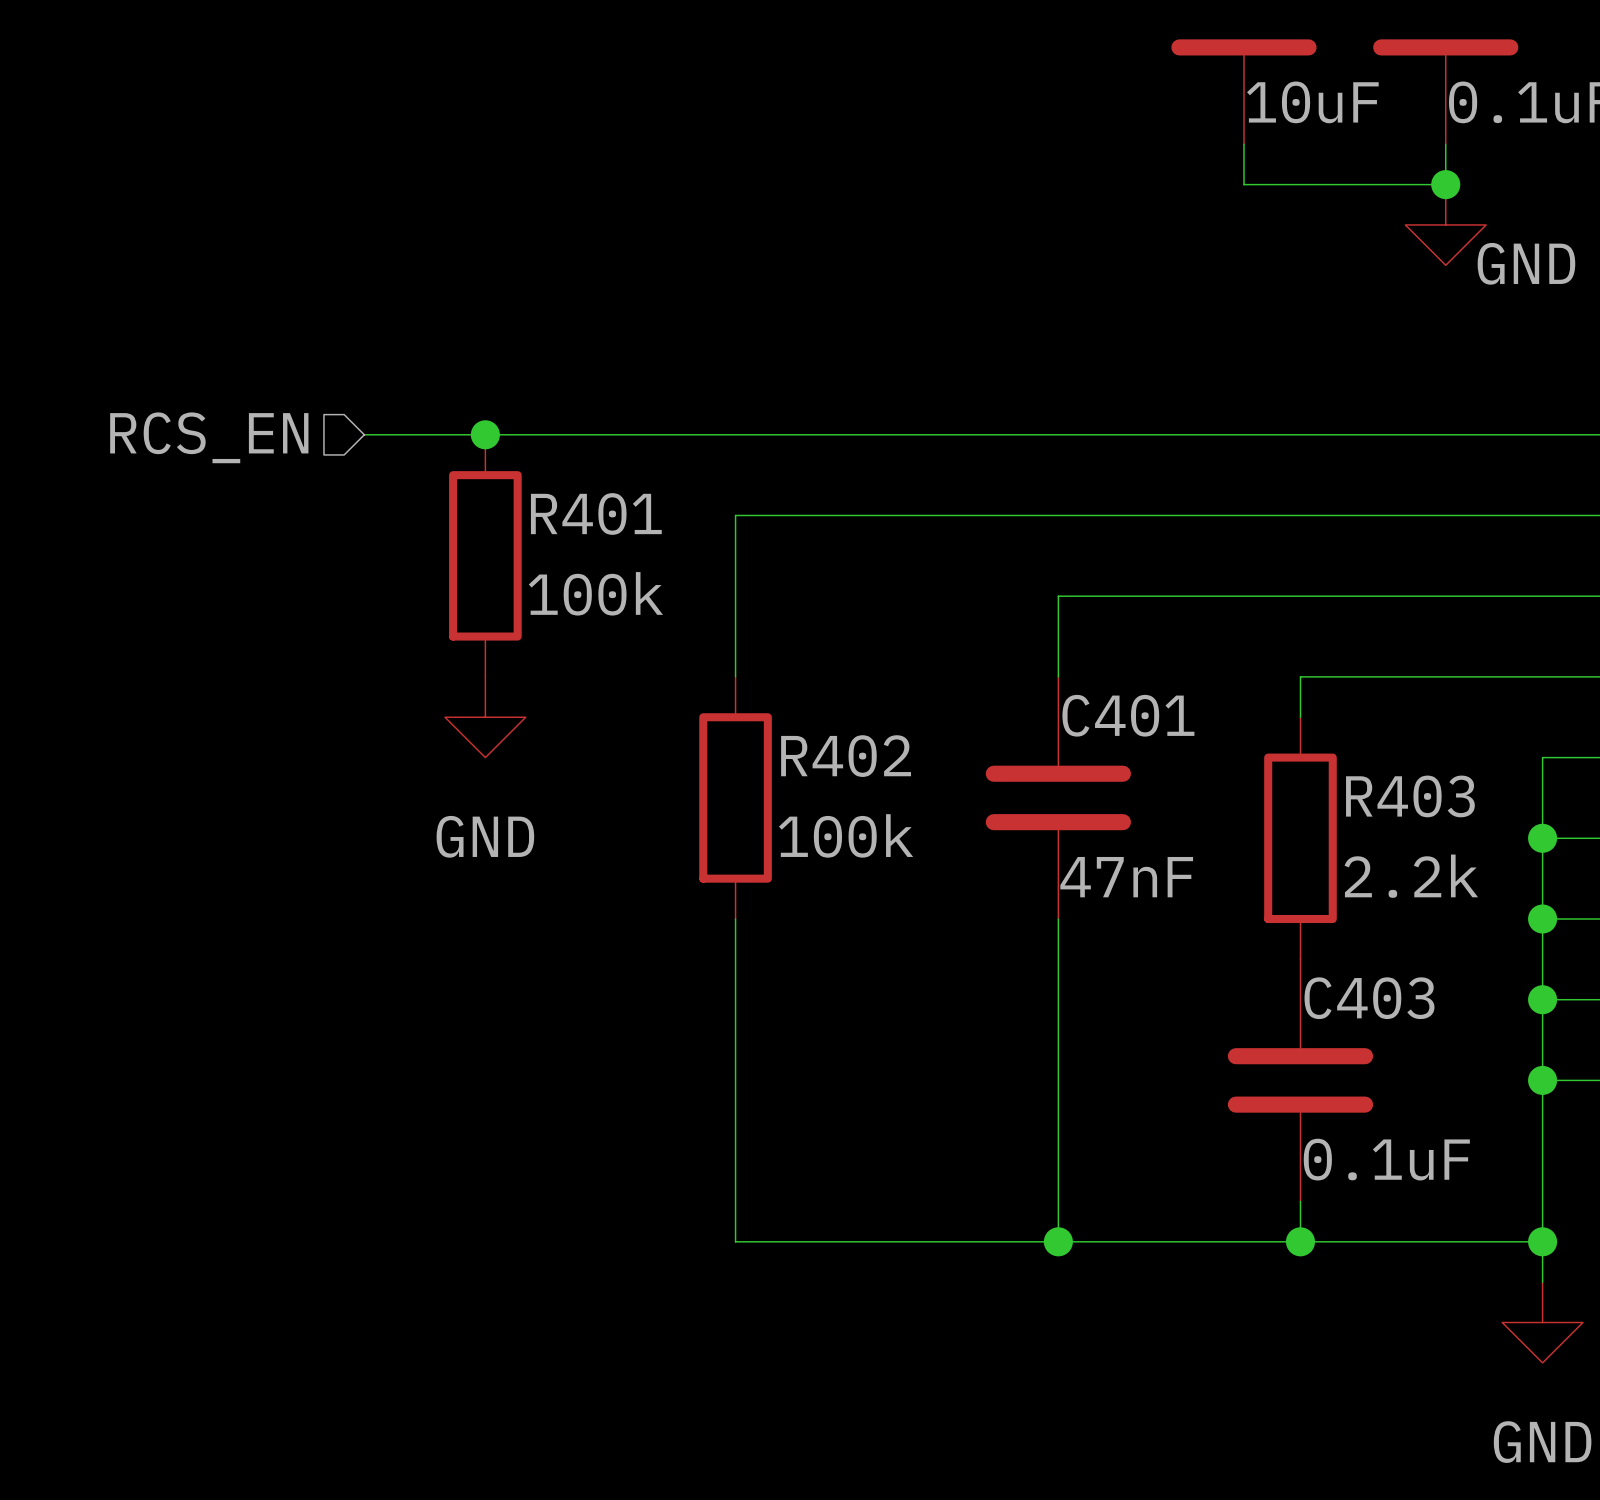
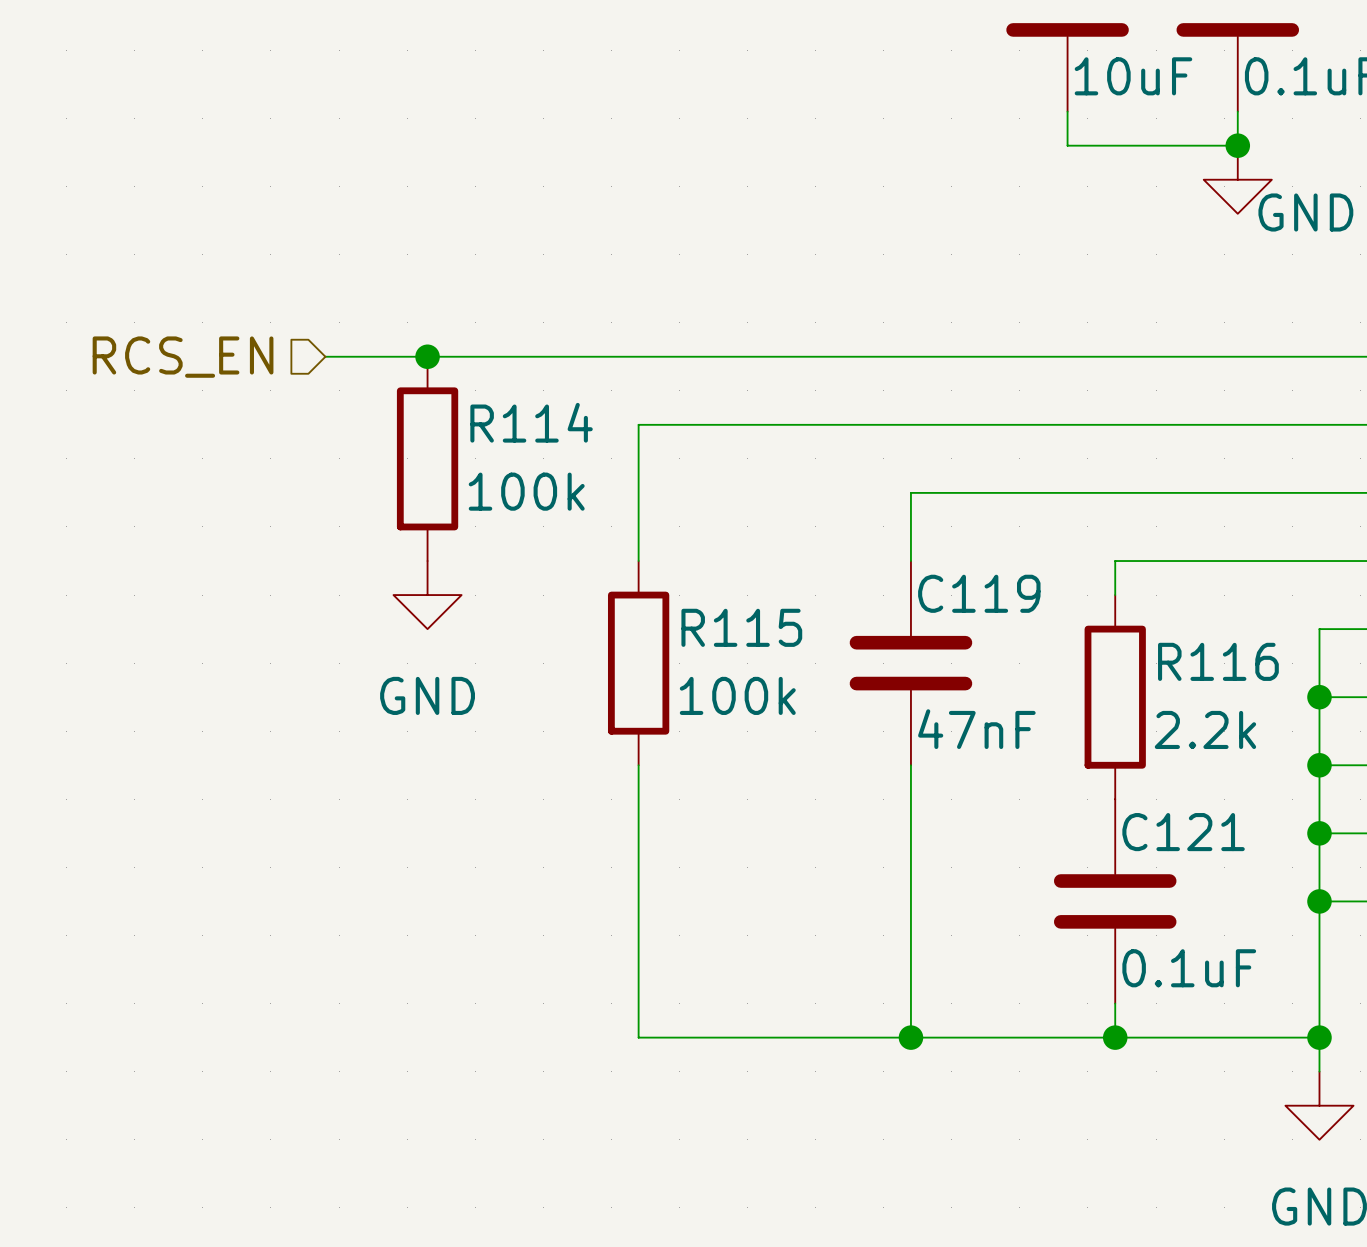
R401 name: R401 (596, 513) -> R114 (531, 422)
C401 name: C401 (1128, 715) -> C119 (979, 593)
R402 name: R402 (846, 756) -> R115 (741, 627)
R403 name: R403 (1410, 796) -> R116 (1218, 661)
C403 name: C403 (1369, 998) -> C121 (1183, 832)

